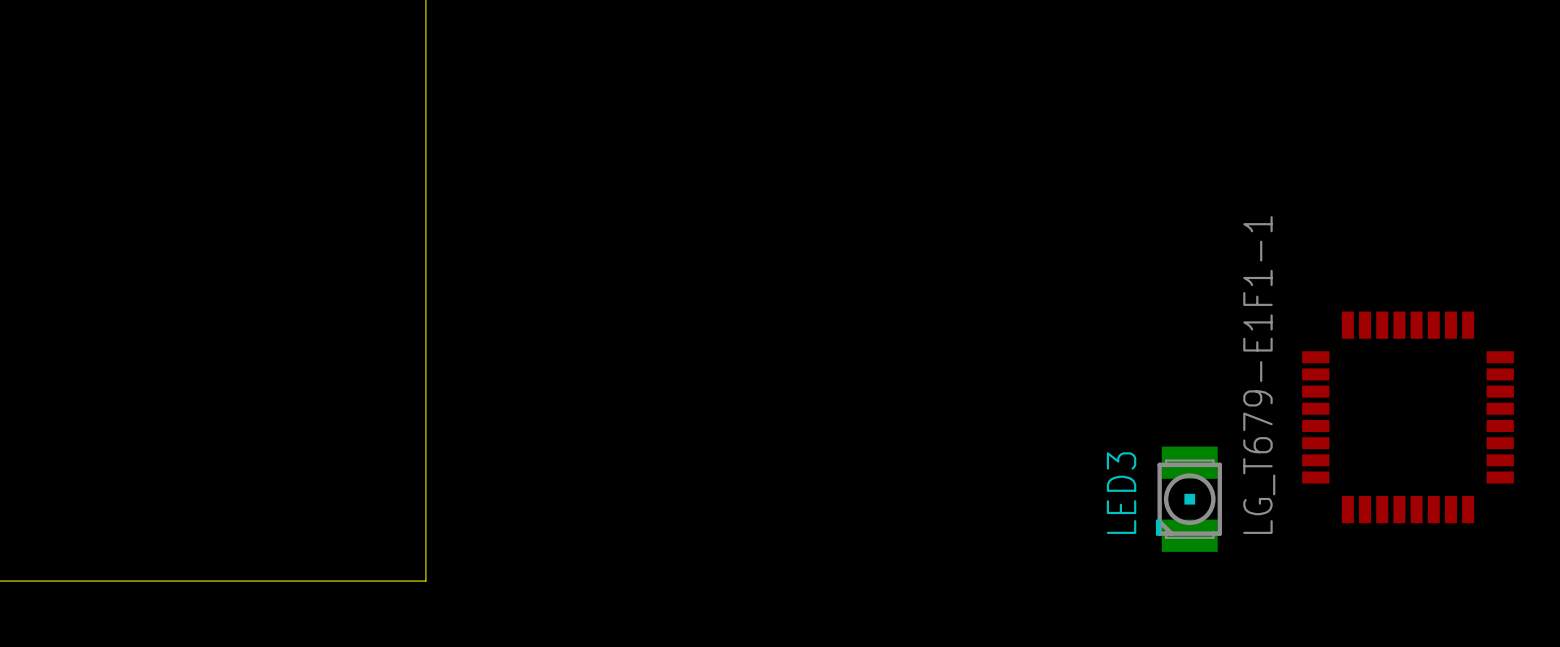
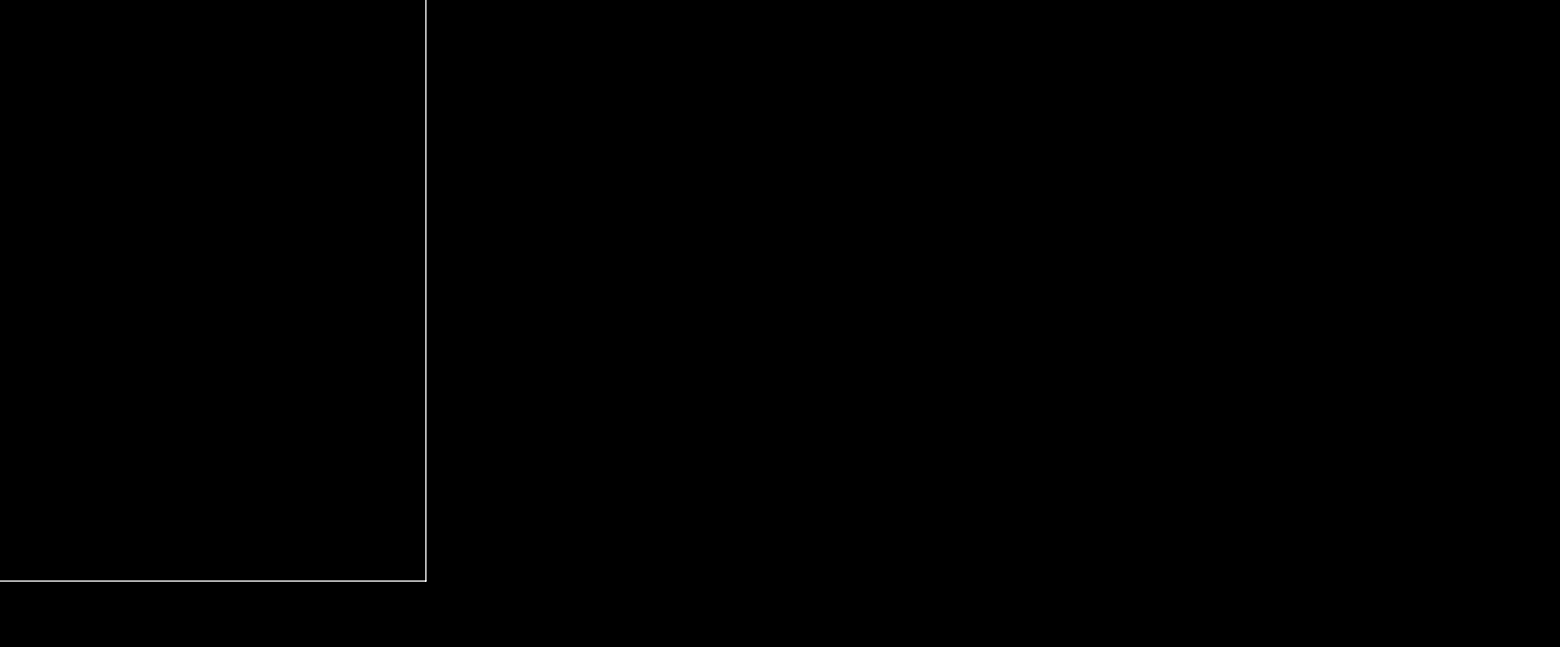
part: (1408, 417) -> none
LED3: LG_T679-E1F1-1 (1188, 499) -> none

